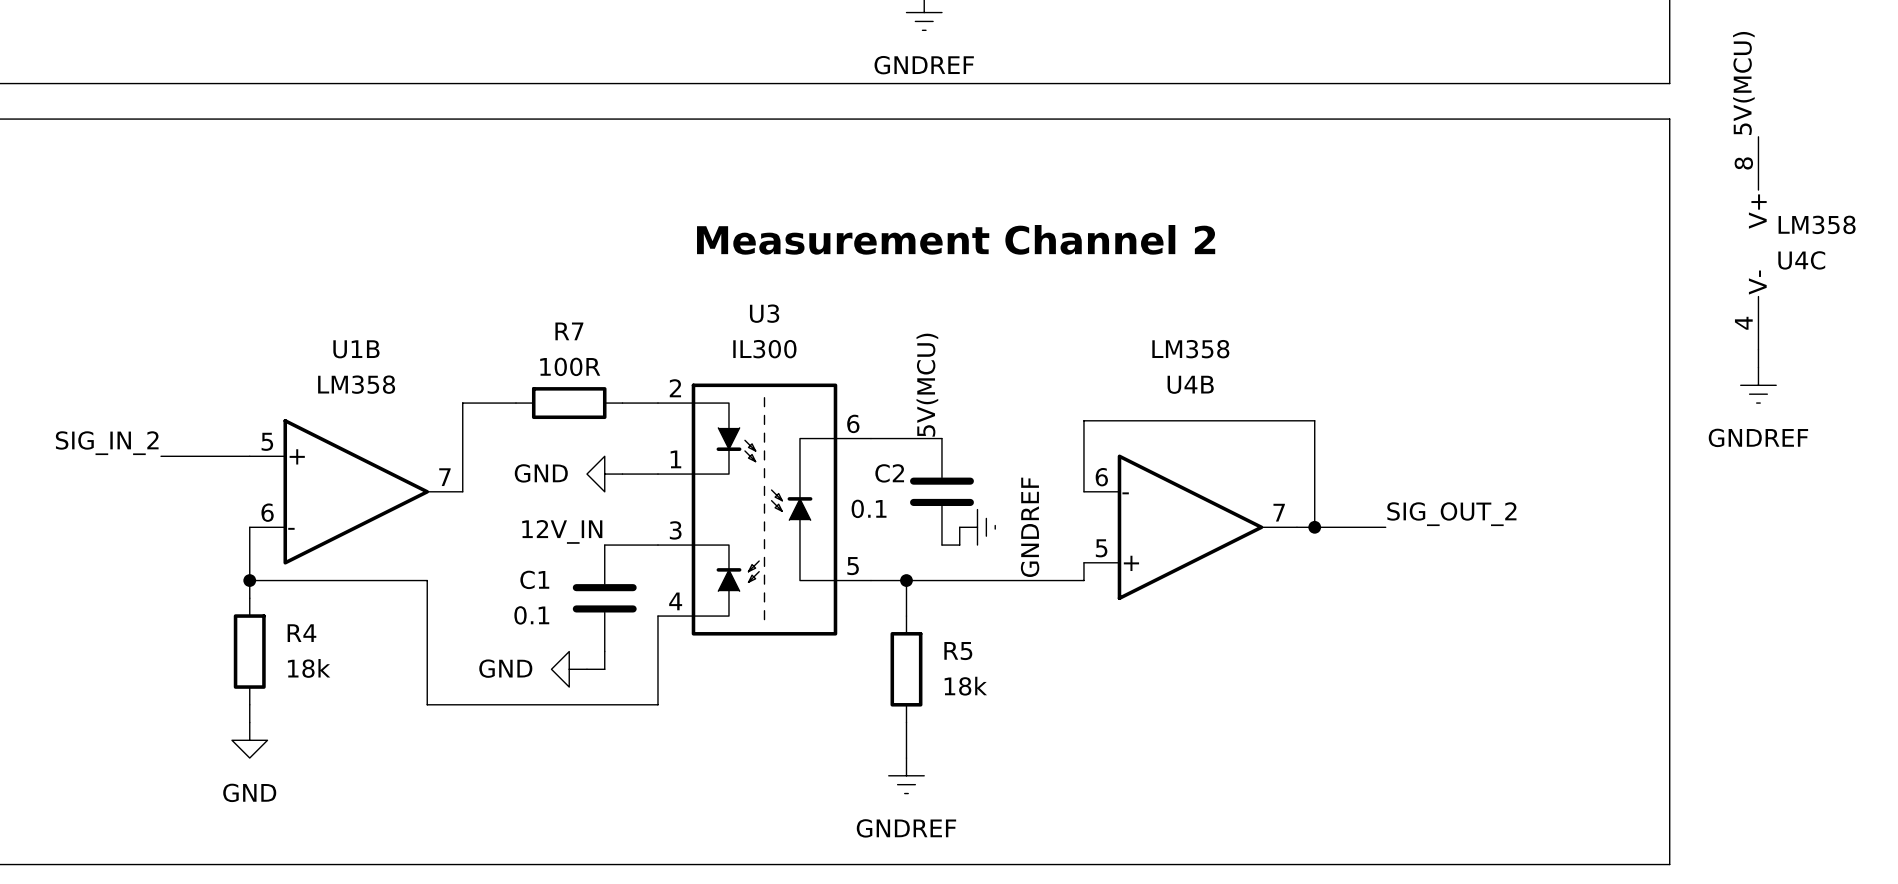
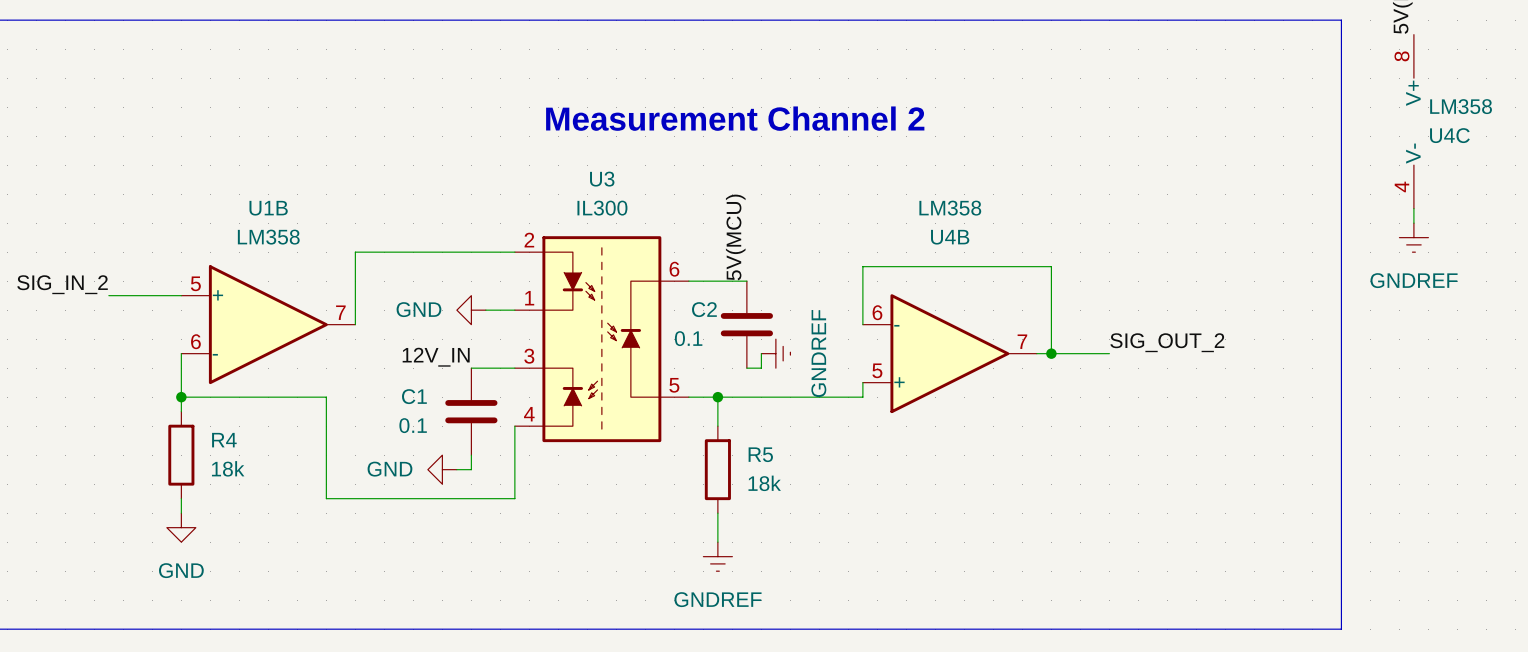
wire: none -> (398, 252) (485, 252)
R7: 100R (569, 403) -> none

